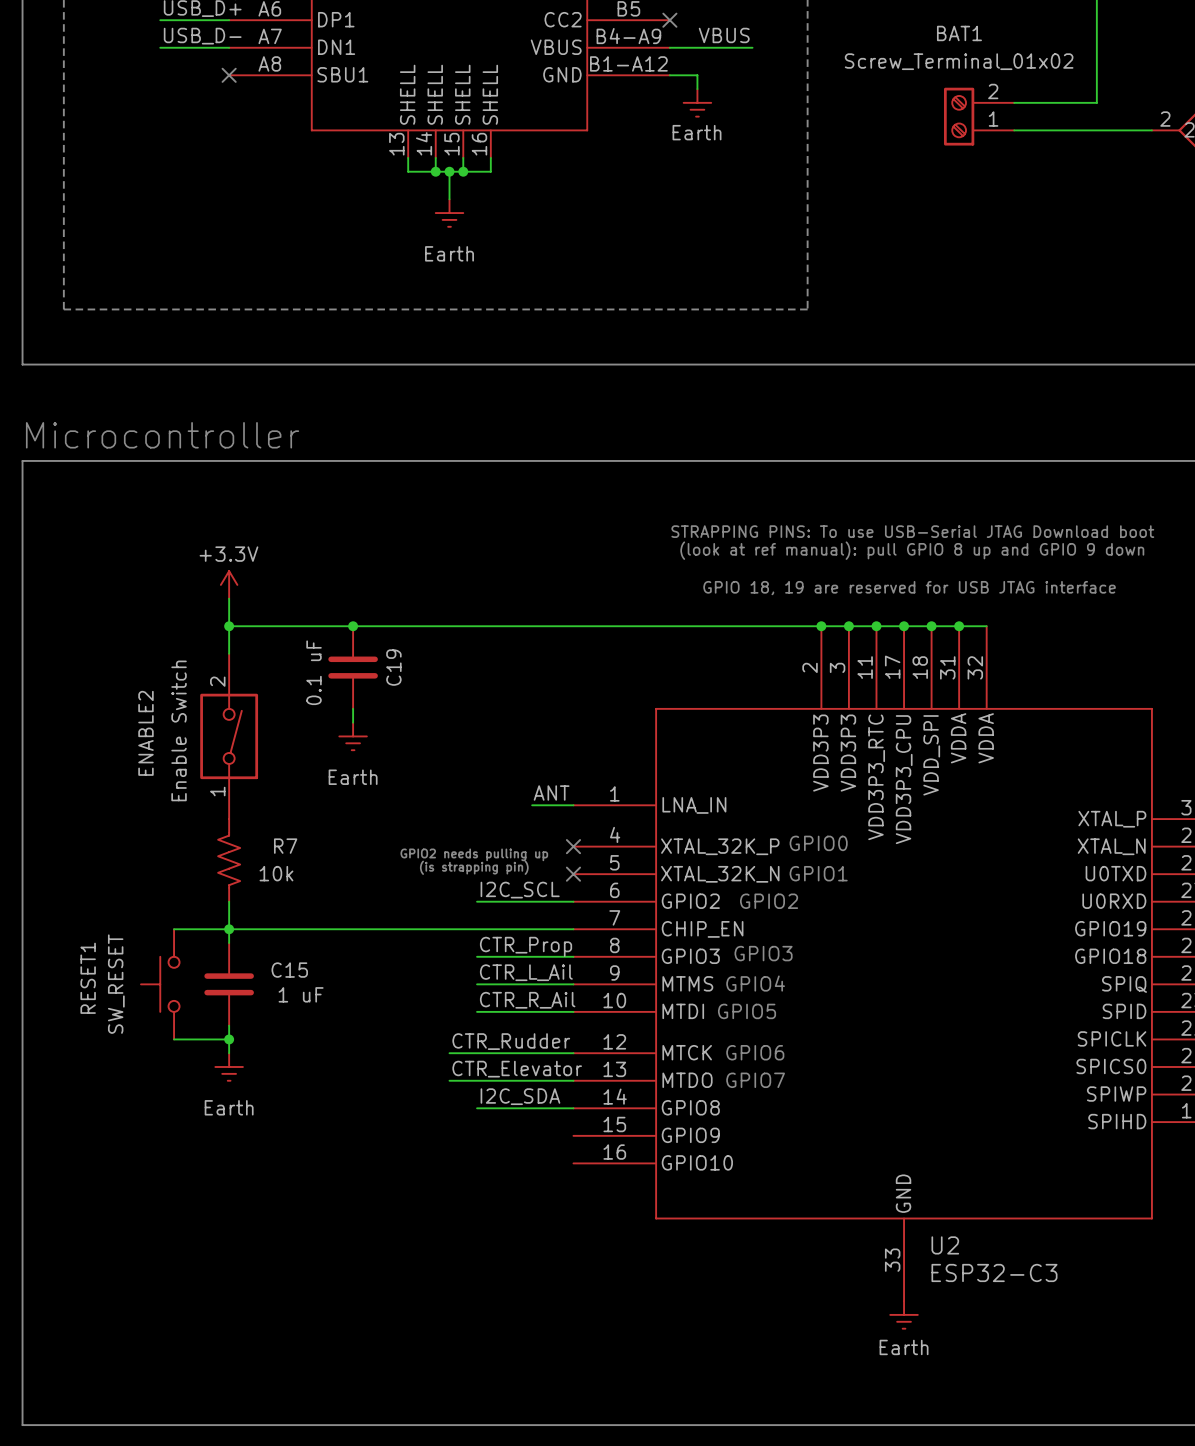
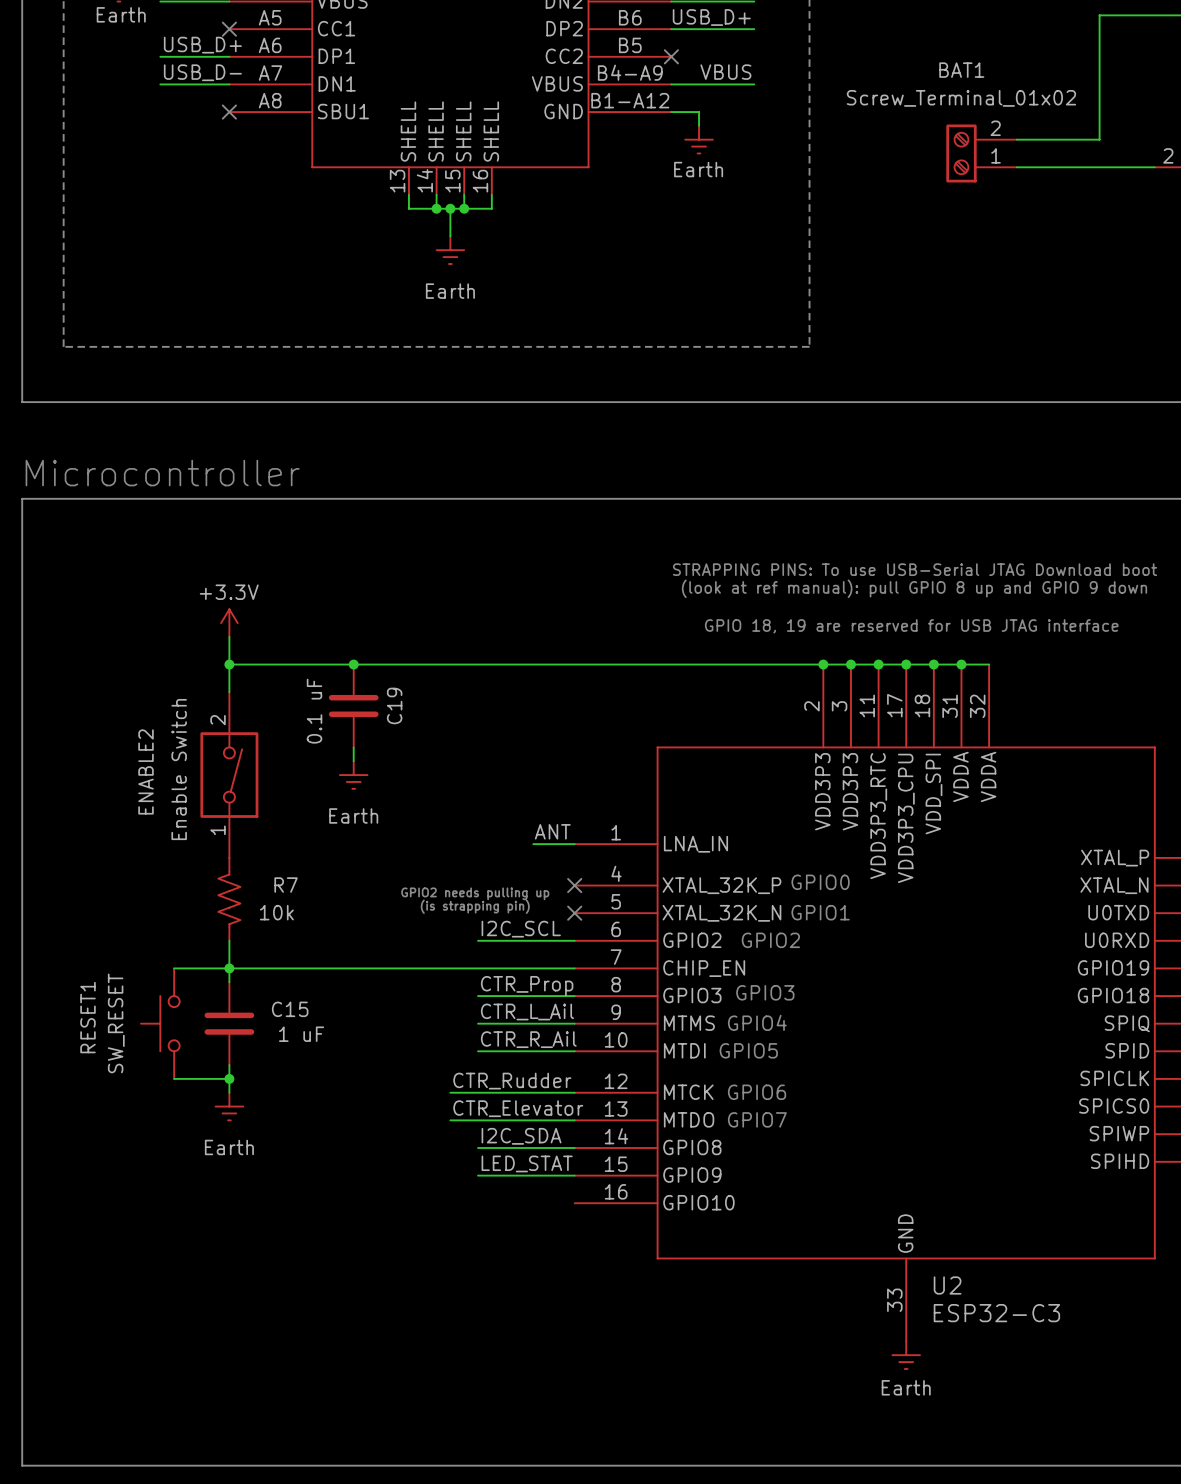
label: none -> LED_STAT (527, 1163)
wire: none -> (478, 1175) (574, 1175)

